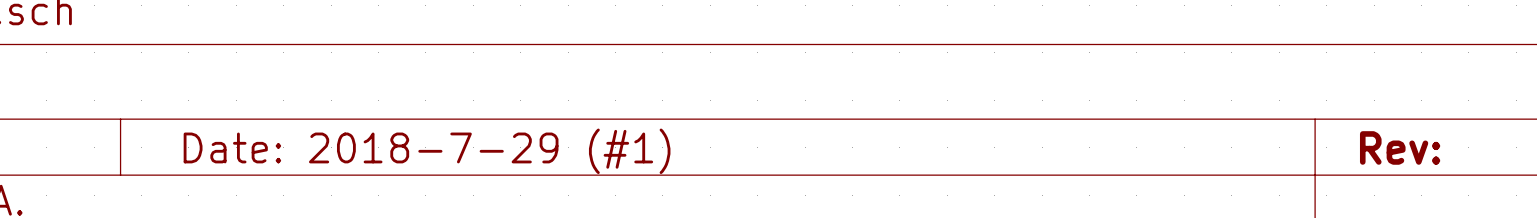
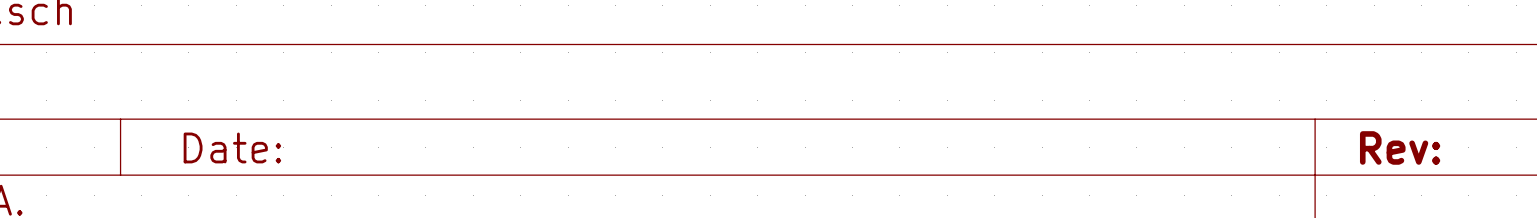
title block: Date: 2018-7-29 (#1) (427, 151) -> Date: (232, 147)

